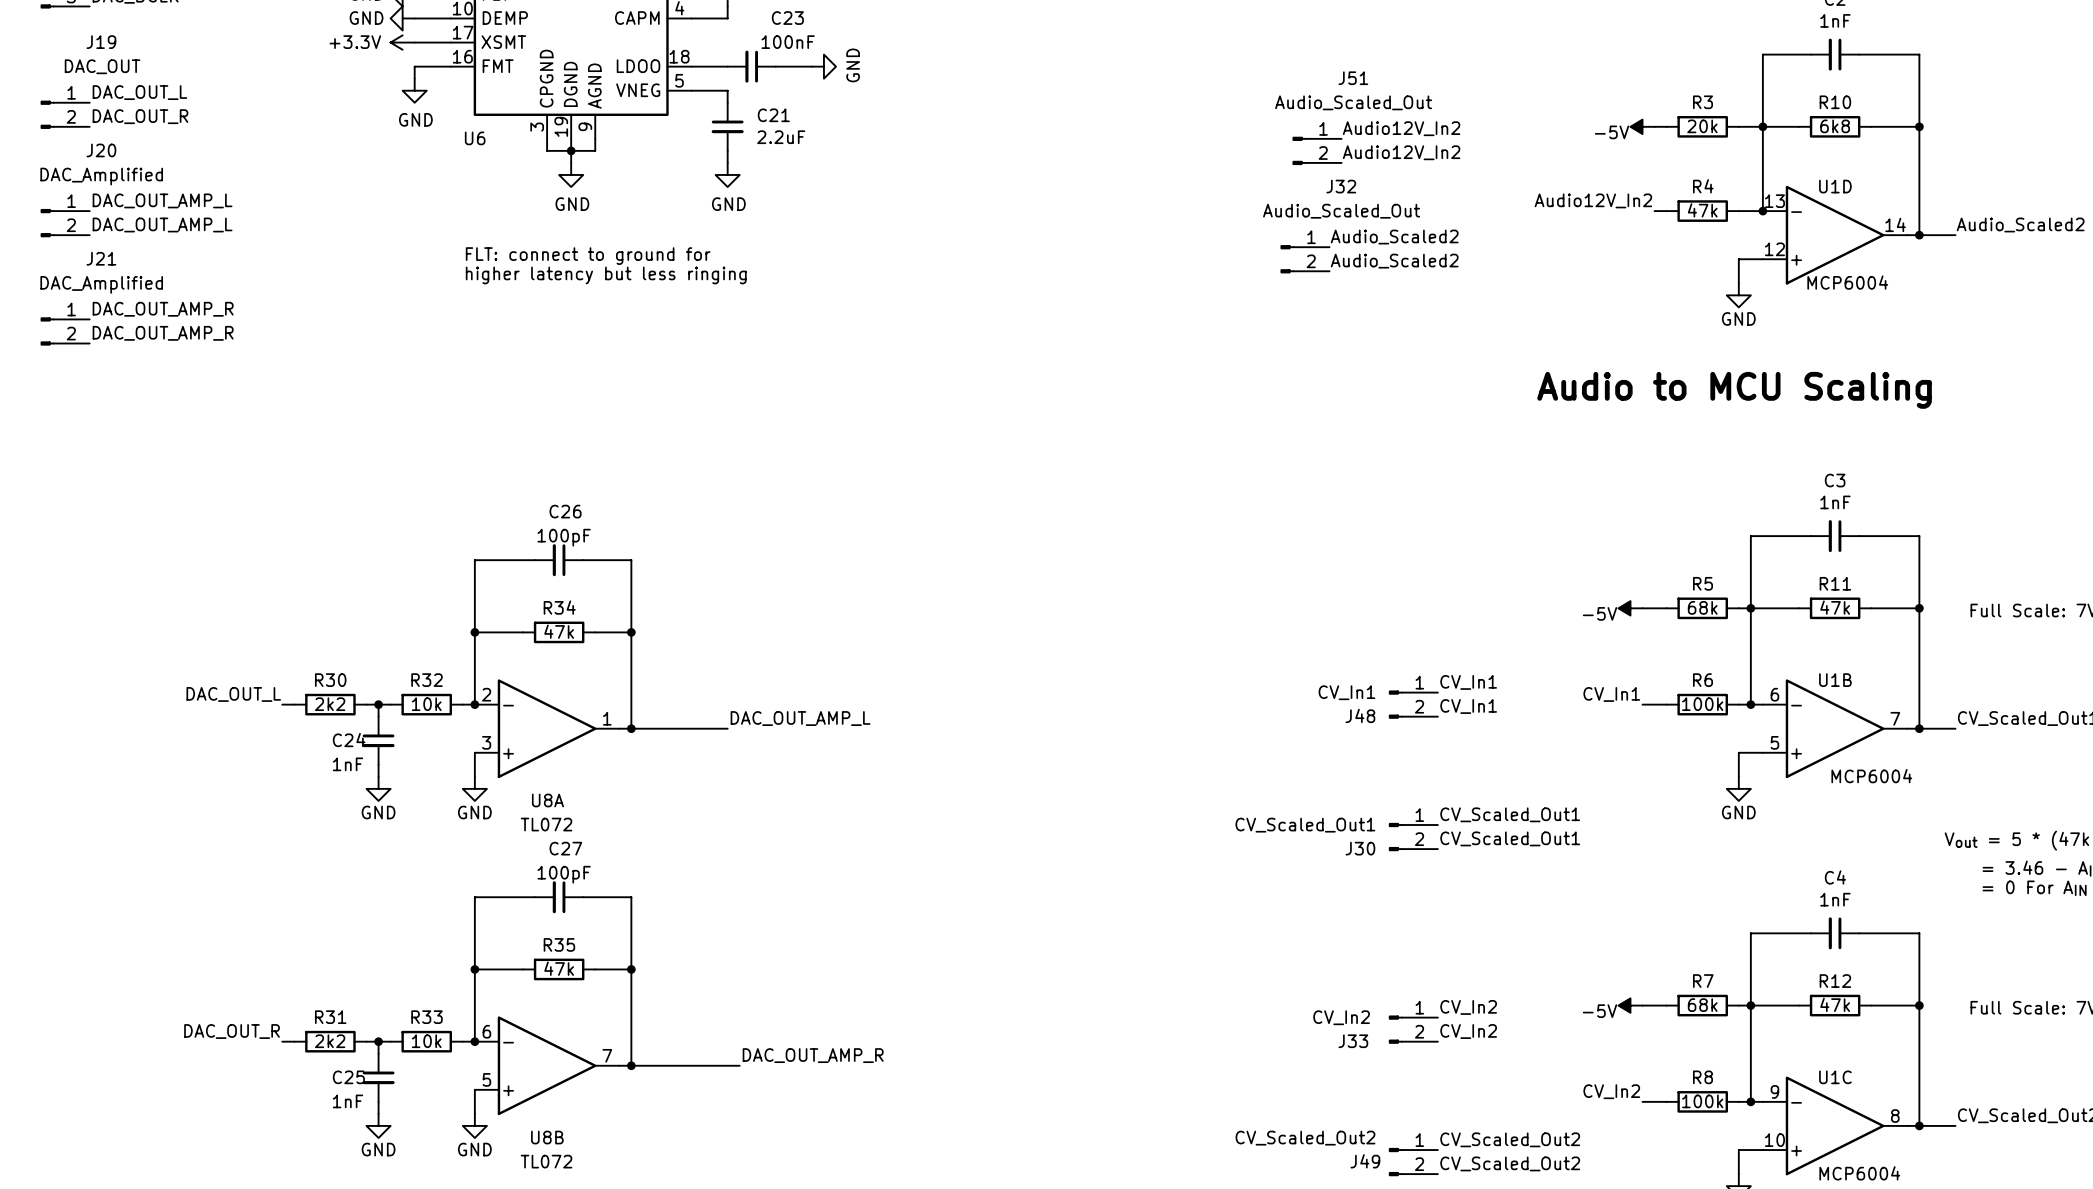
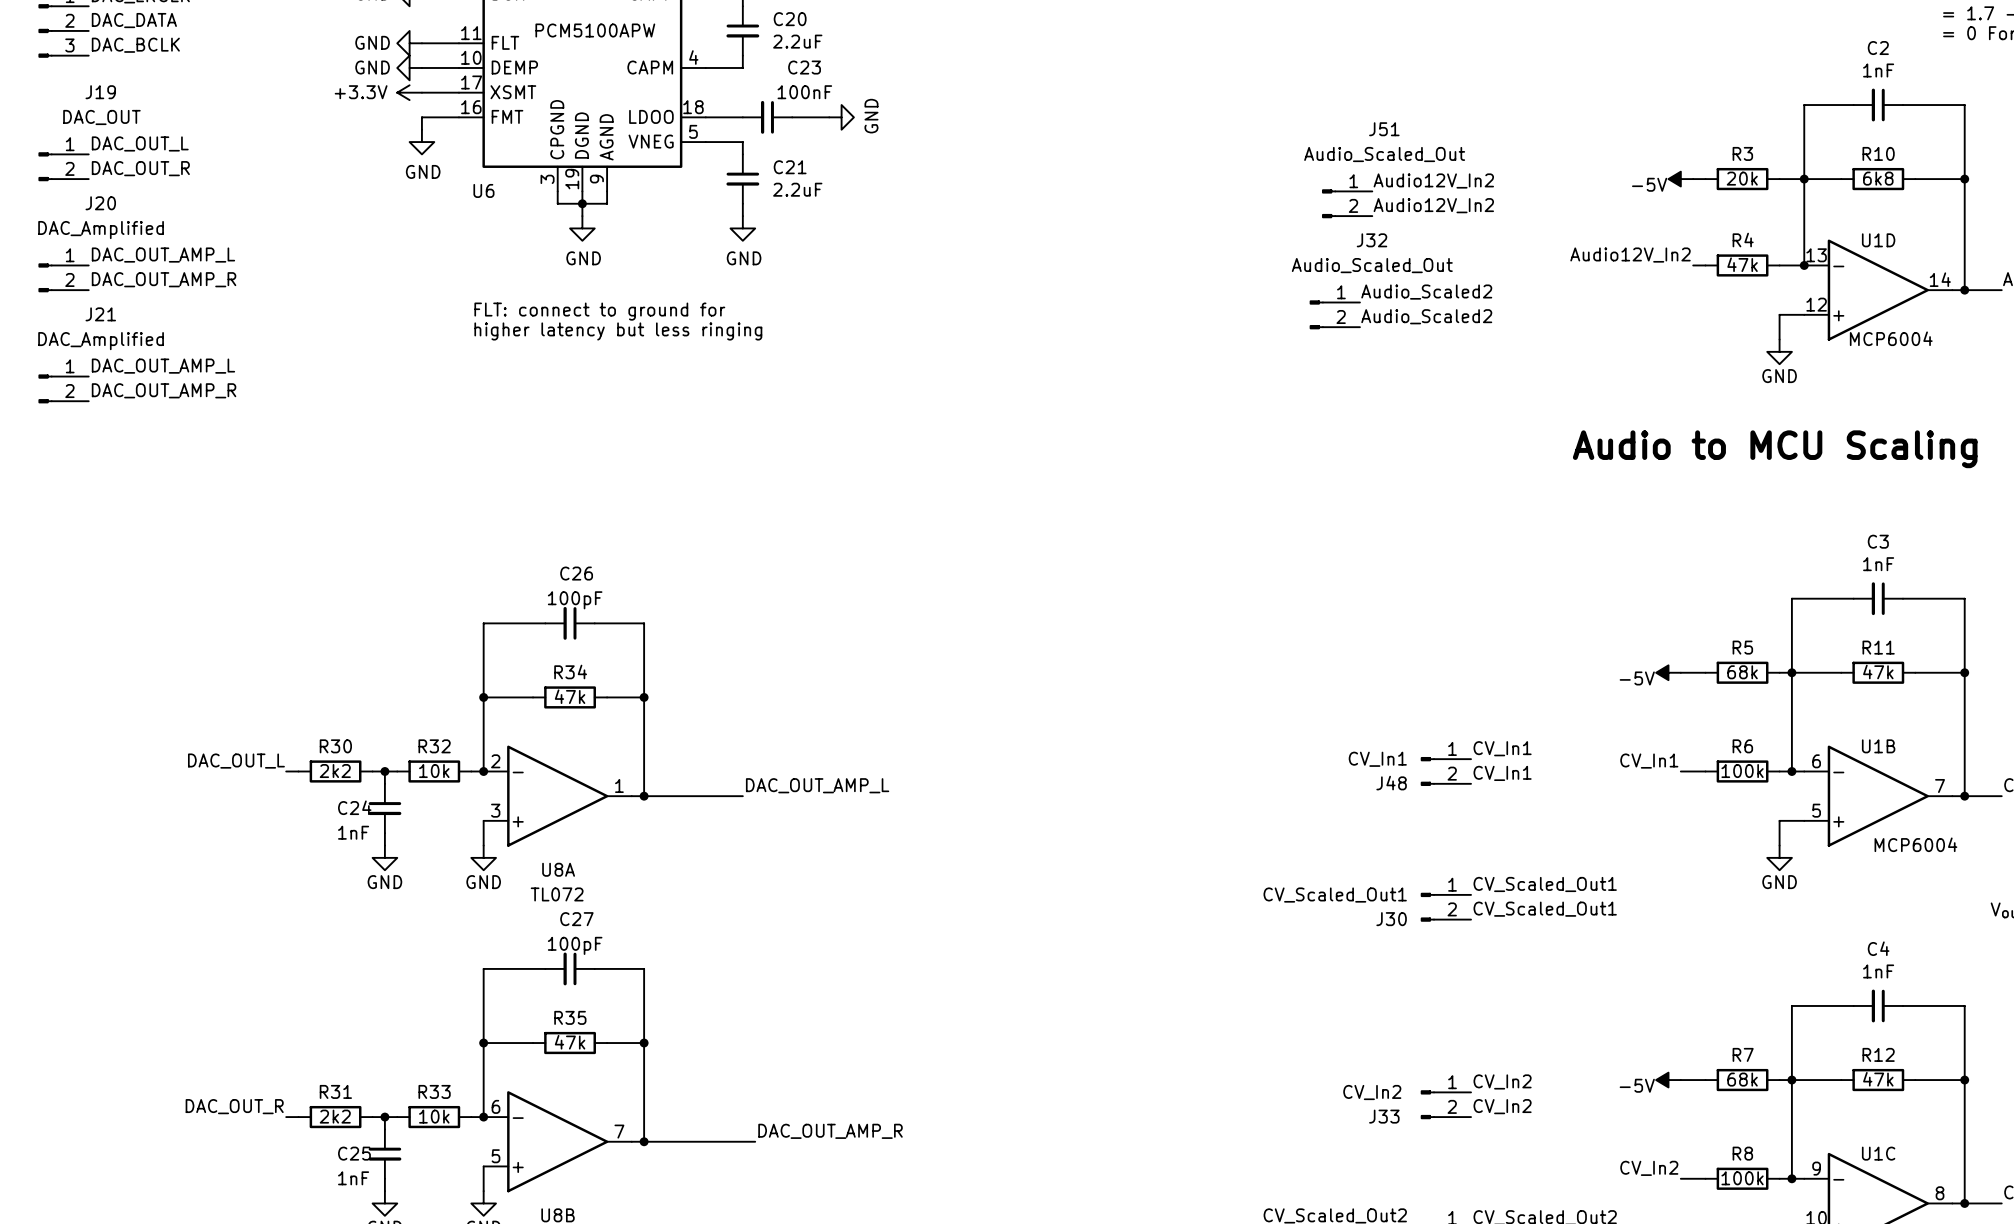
label: DAC_OUT_AMP_L (162, 224) -> DAC_OUT_AMP_R (164, 279)
label: DAC_OUT_AMP_R (163, 309) -> DAC_OUT_AMP_L (163, 366)

